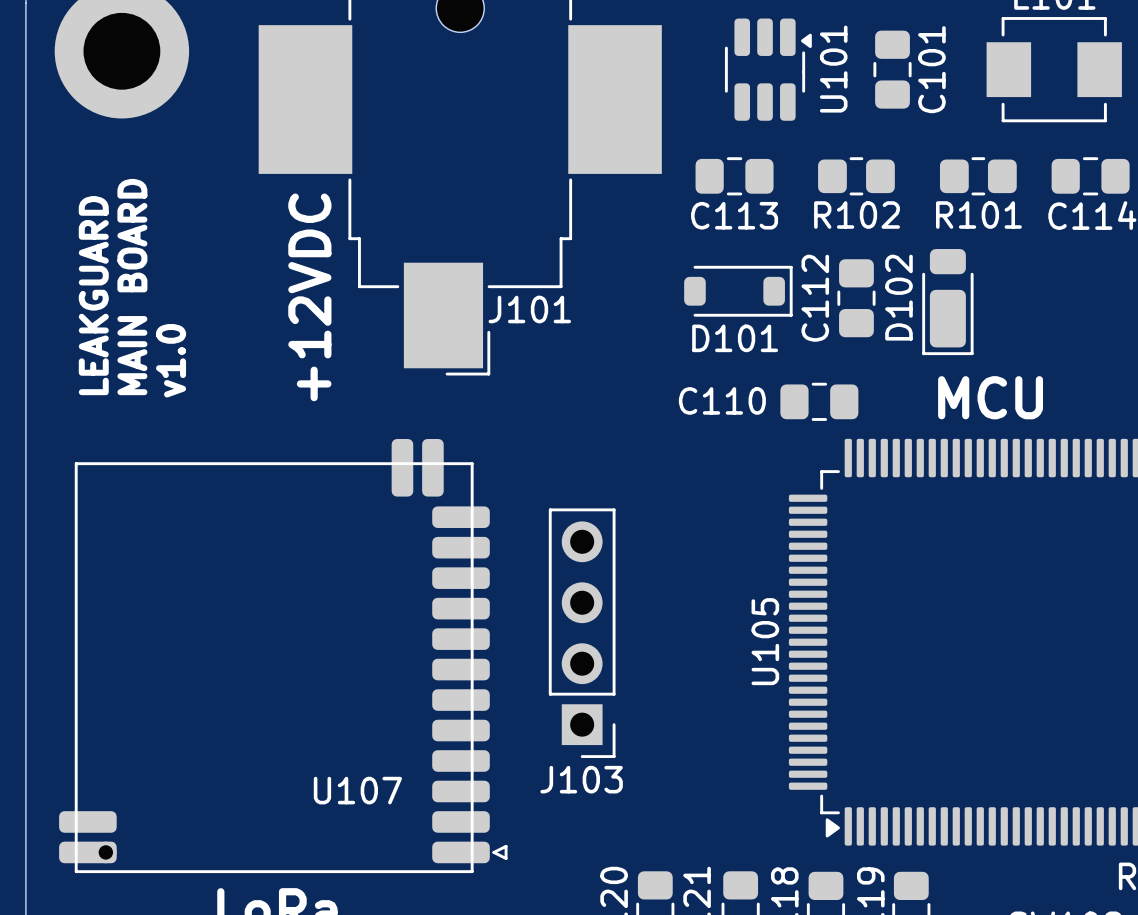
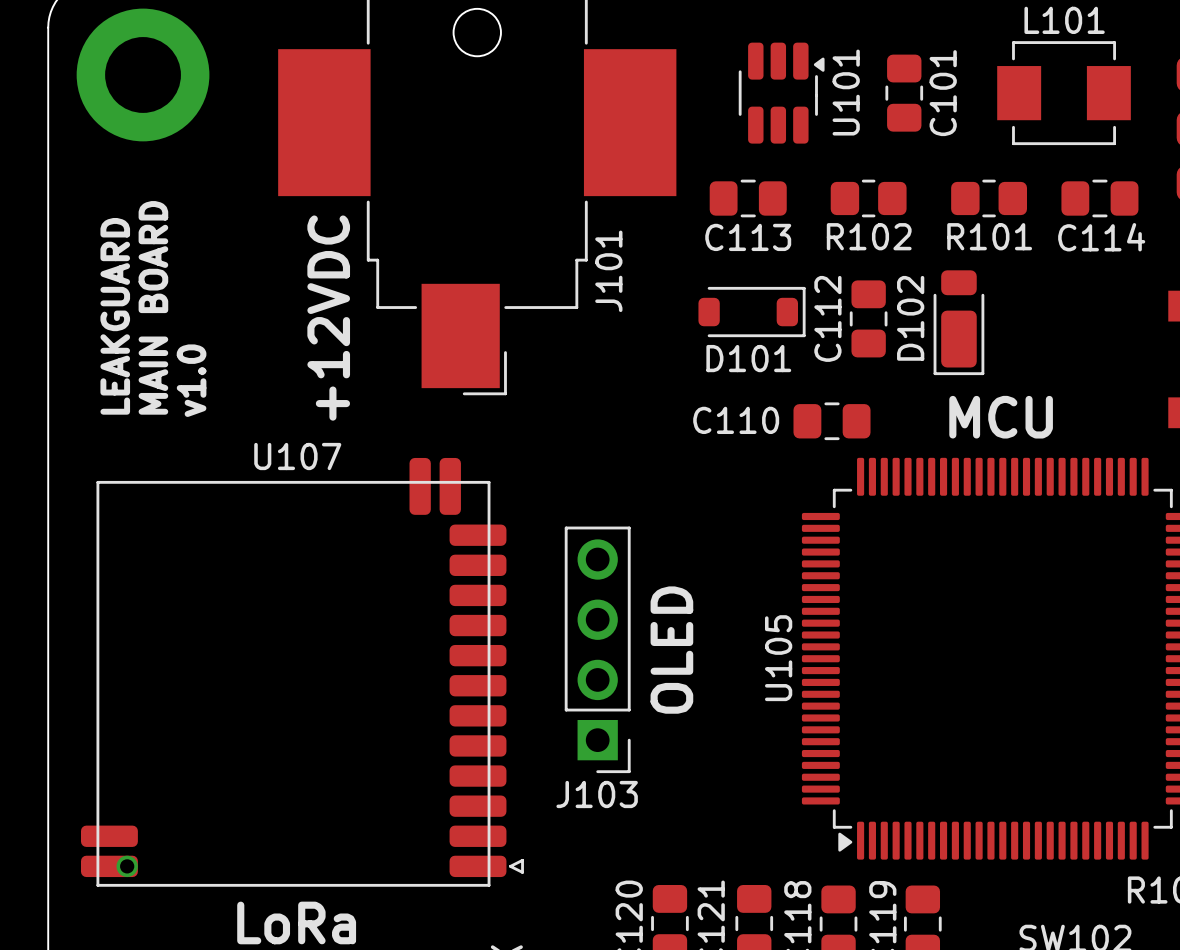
J101 name rotation: 0° (529, 309) -> 90° counterclockwise (608, 271)
text: none -> OLED (671, 650)
U107 name position: U107 (357, 790) -> U107 (297, 456)

